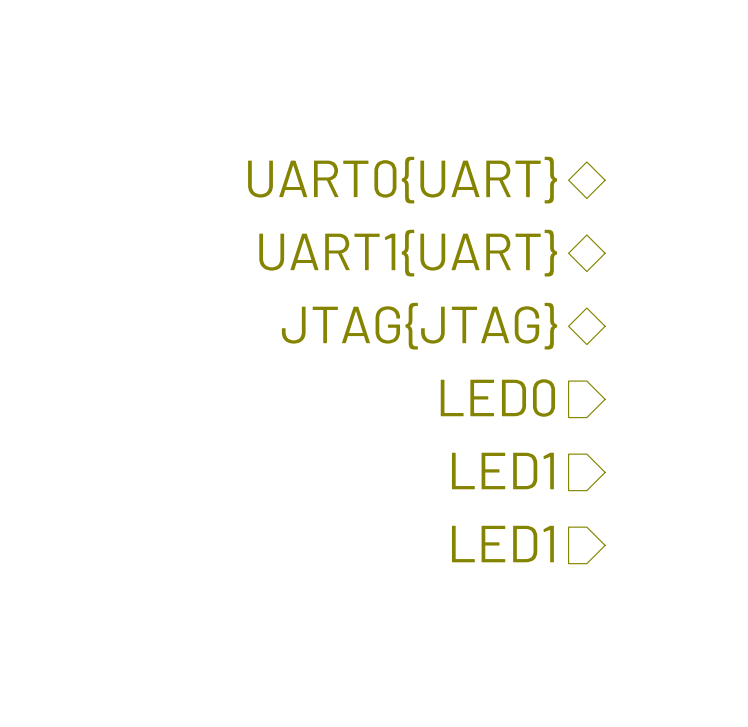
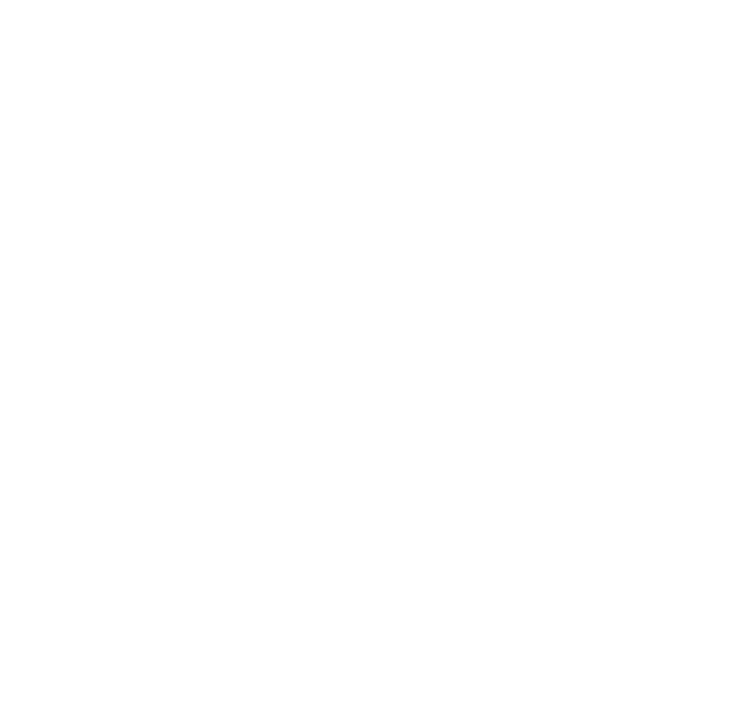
hierarchical label: UART0{UART} (402, 180) -> none
hierarchical label: UART1{UART} (408, 253) -> none
hierarchical label: JTAG{JTAG} (419, 326) -> none
hierarchical label: LED0 (497, 398) -> none
hierarchical label: LED1 (502, 471) -> none
hierarchical label: LED1 (502, 544) -> none

